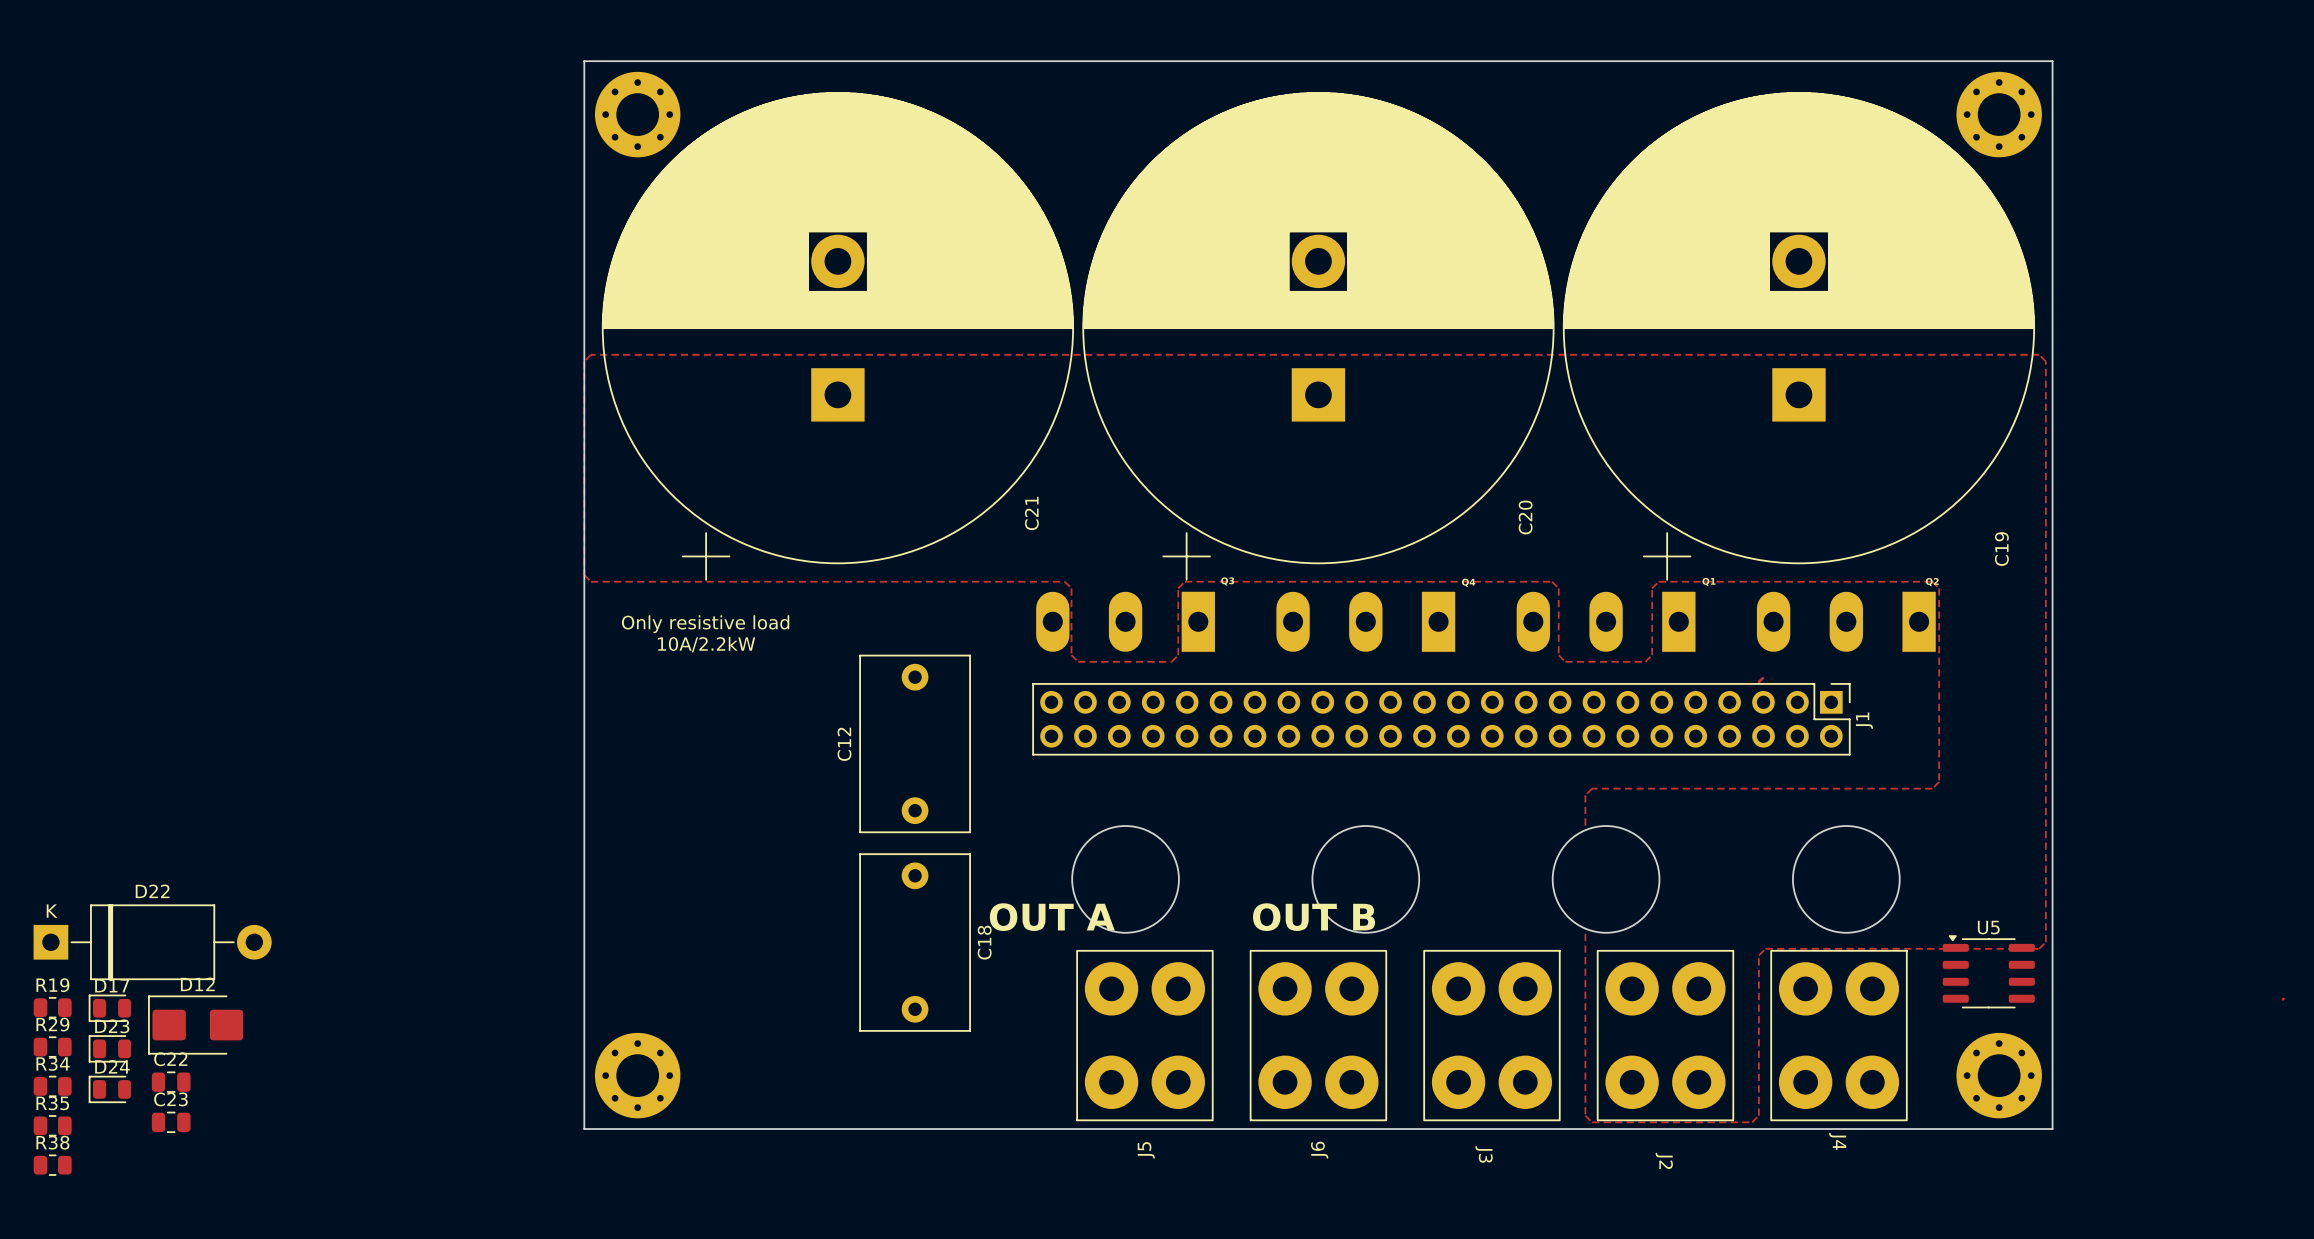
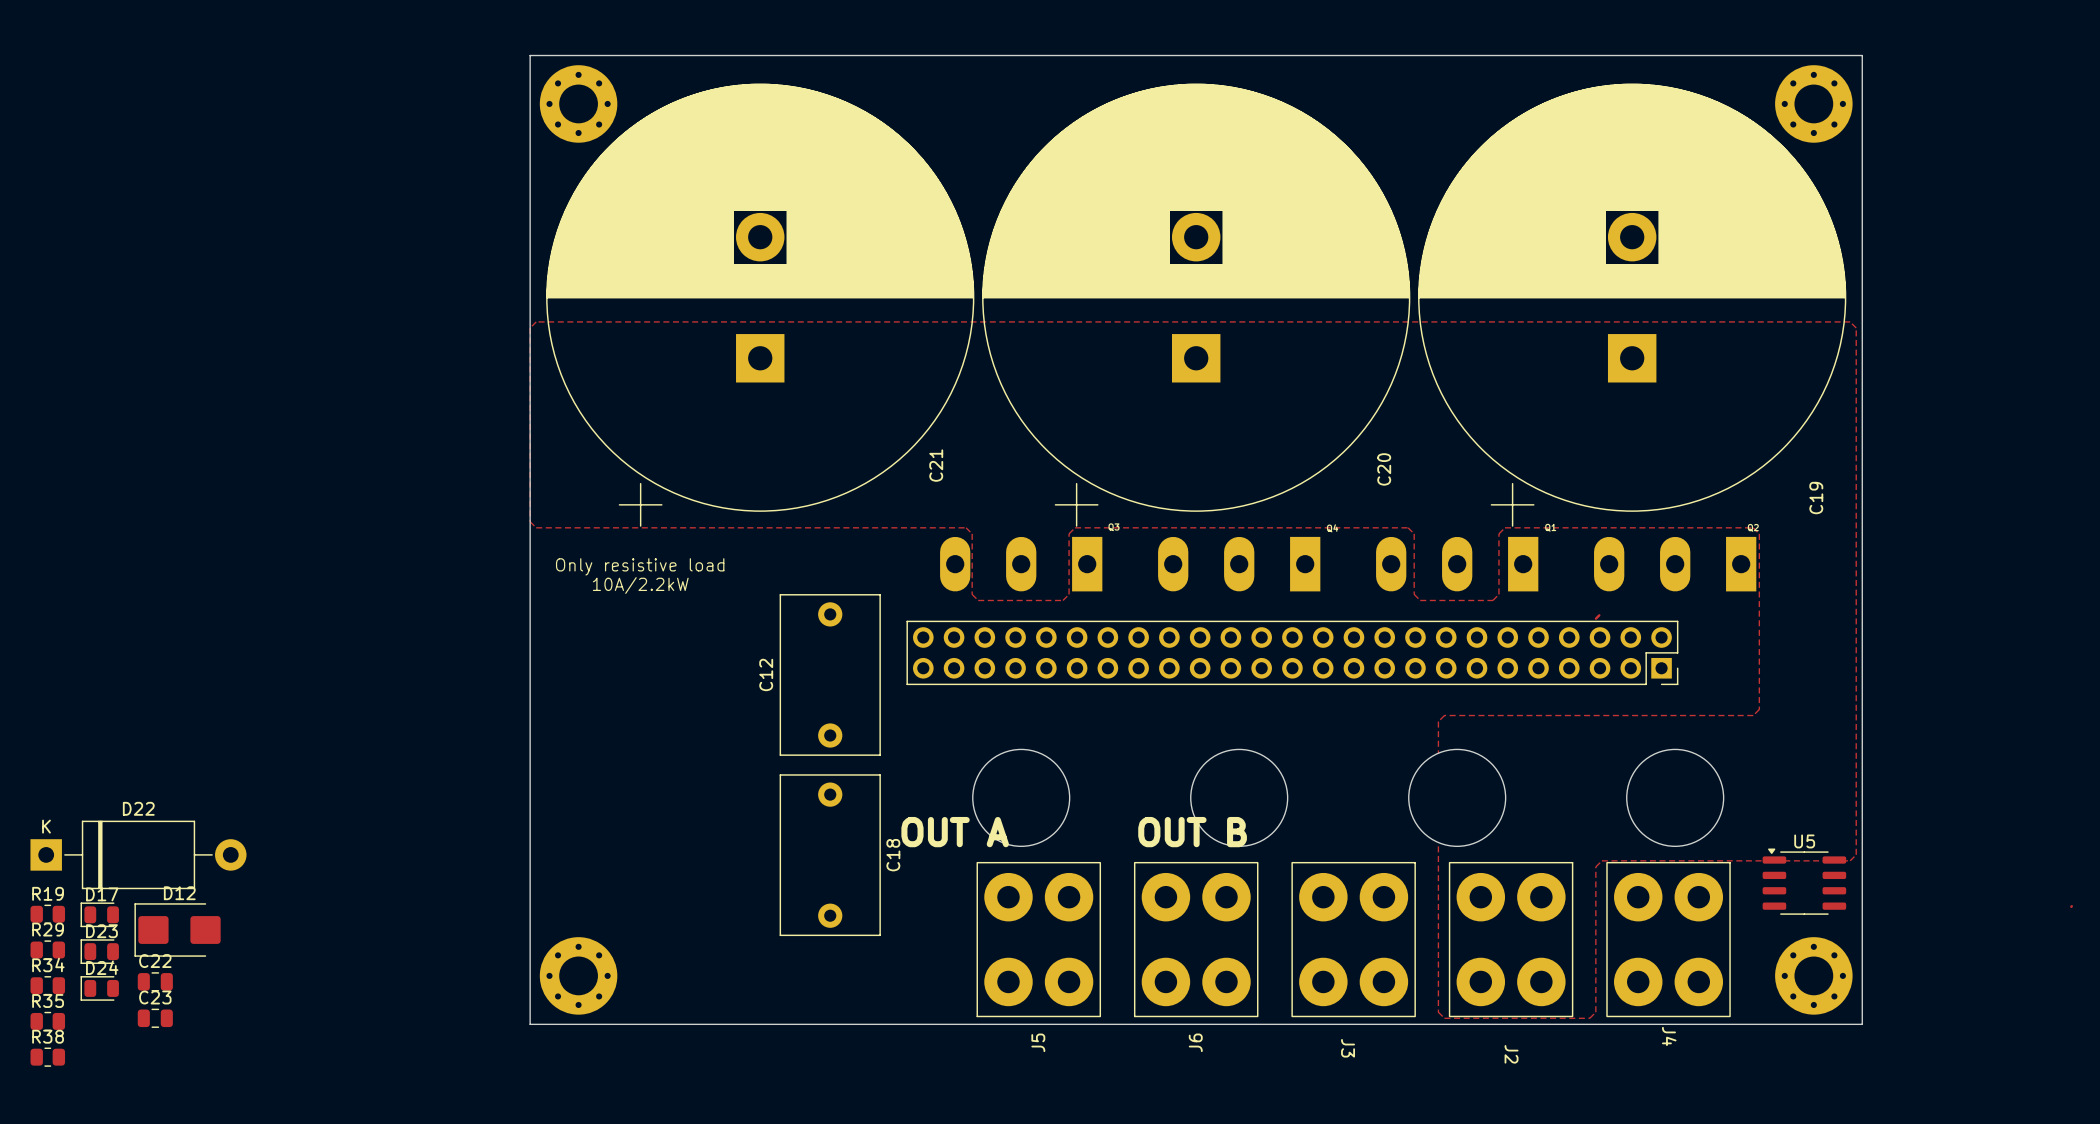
part: none -> (1292, 652)
J1: (1441, 719) -> none

